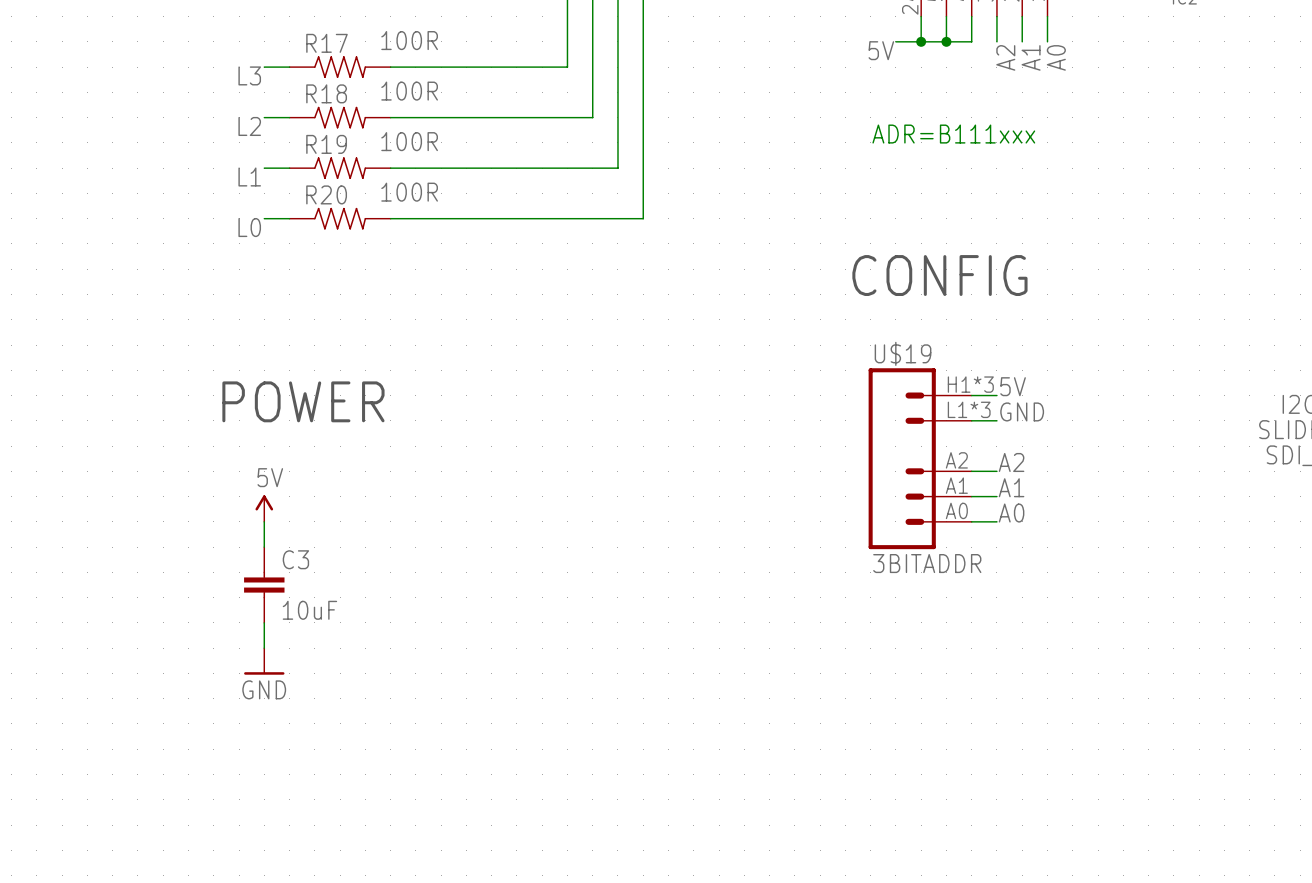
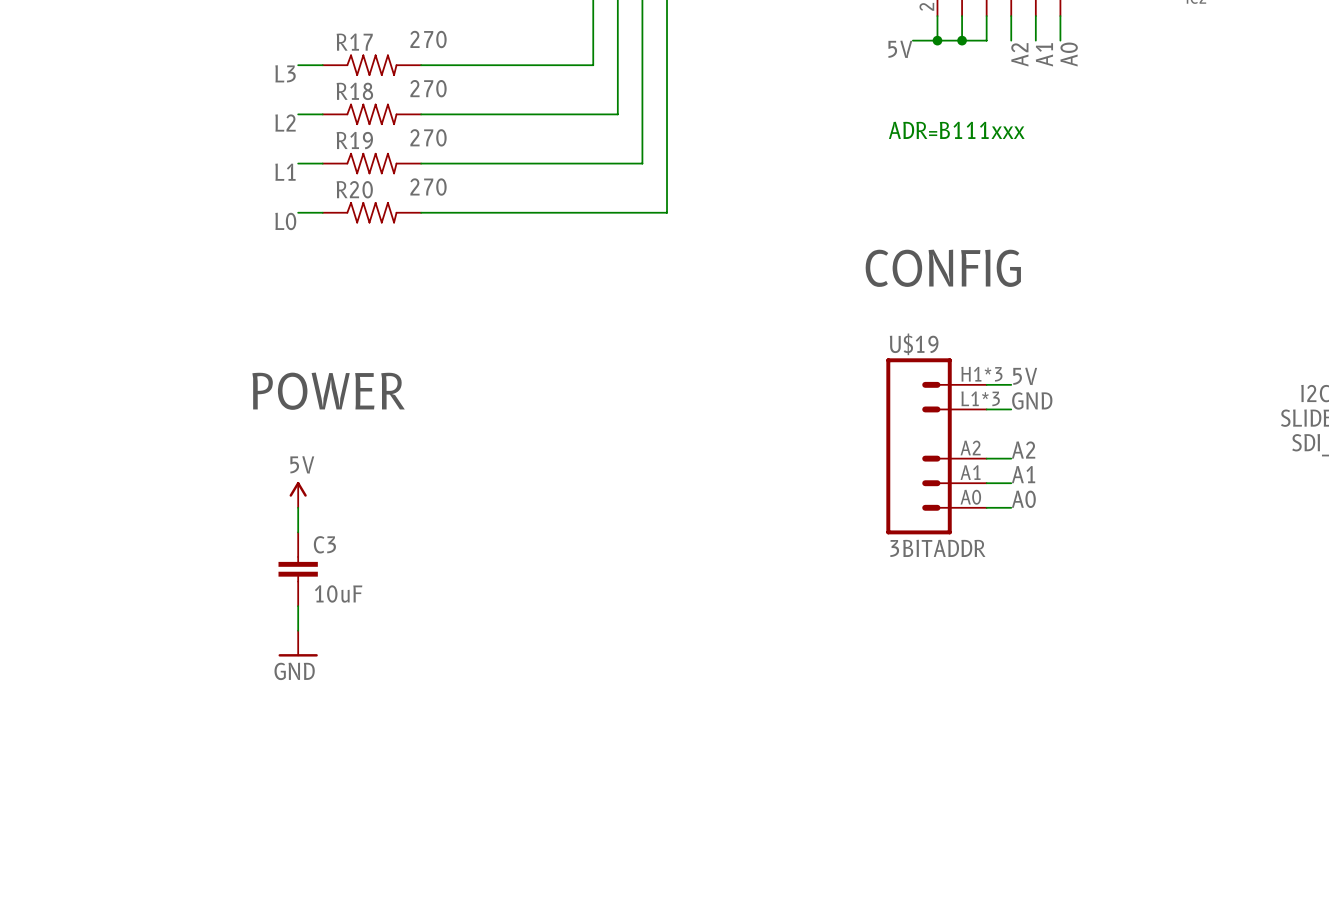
R17 value: 100R (409, 40) -> 270 (428, 39)
R18 value: 100R (409, 91) -> 270 (428, 88)
R19 value: 100R (409, 141) -> 270 (428, 137)
R20 value: 100R (409, 192) -> 270 (428, 187)

